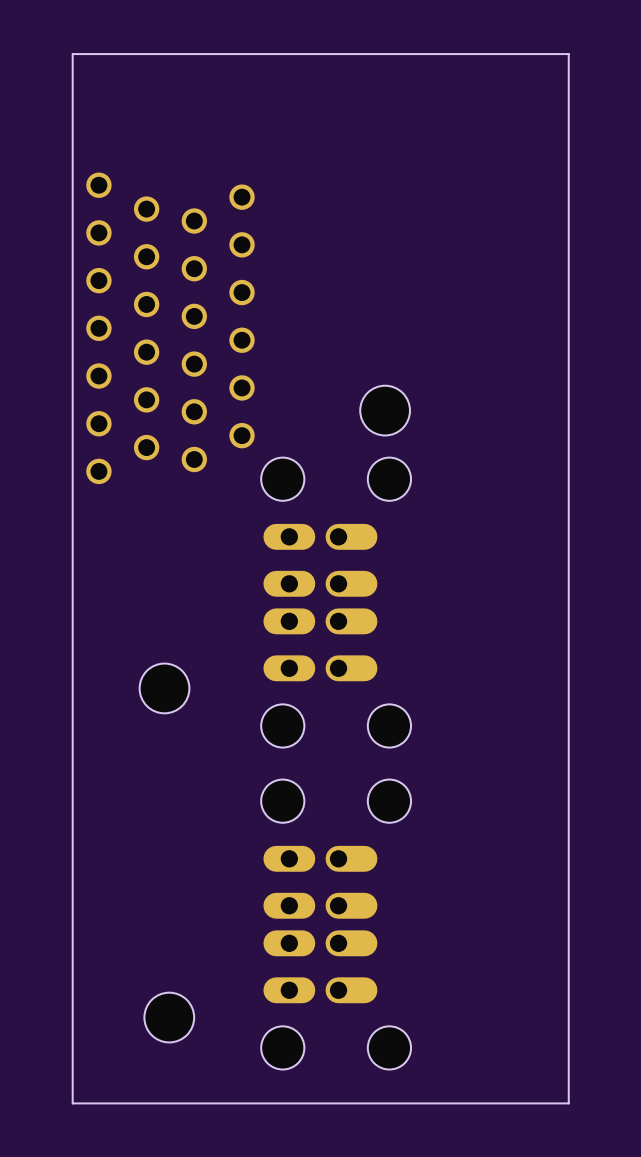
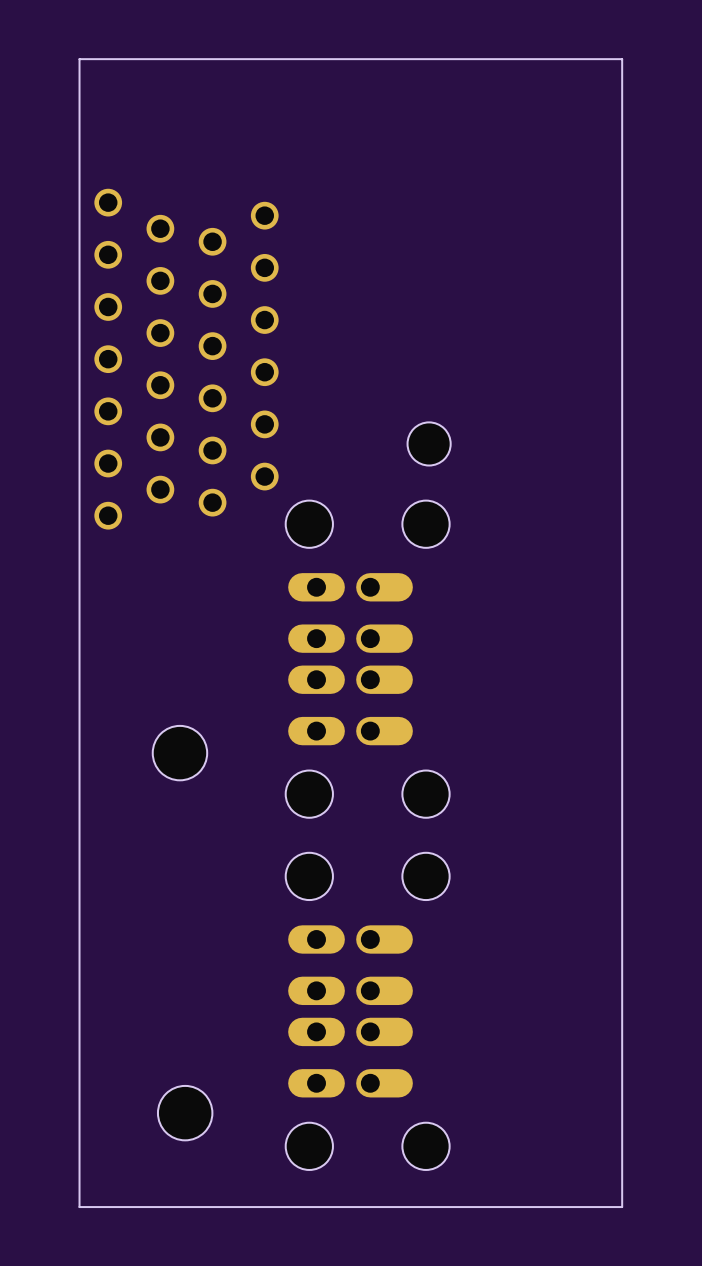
hole size: [360, 385, 410, 436] -> [407, 422, 451, 466]

